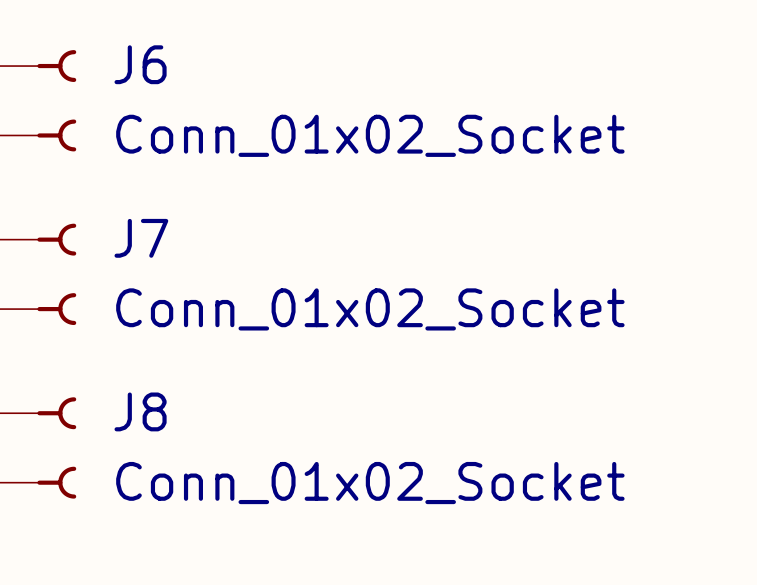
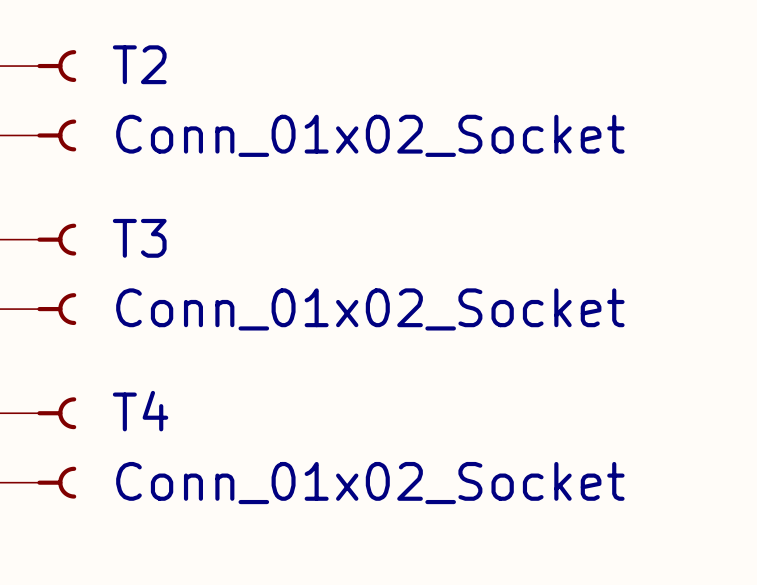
J6 name: J6 (140, 64) -> T2 (139, 64)
J7 name: J7 (141, 238) -> T3 (139, 238)
J8 name: J8 (140, 411) -> T4 (140, 411)

